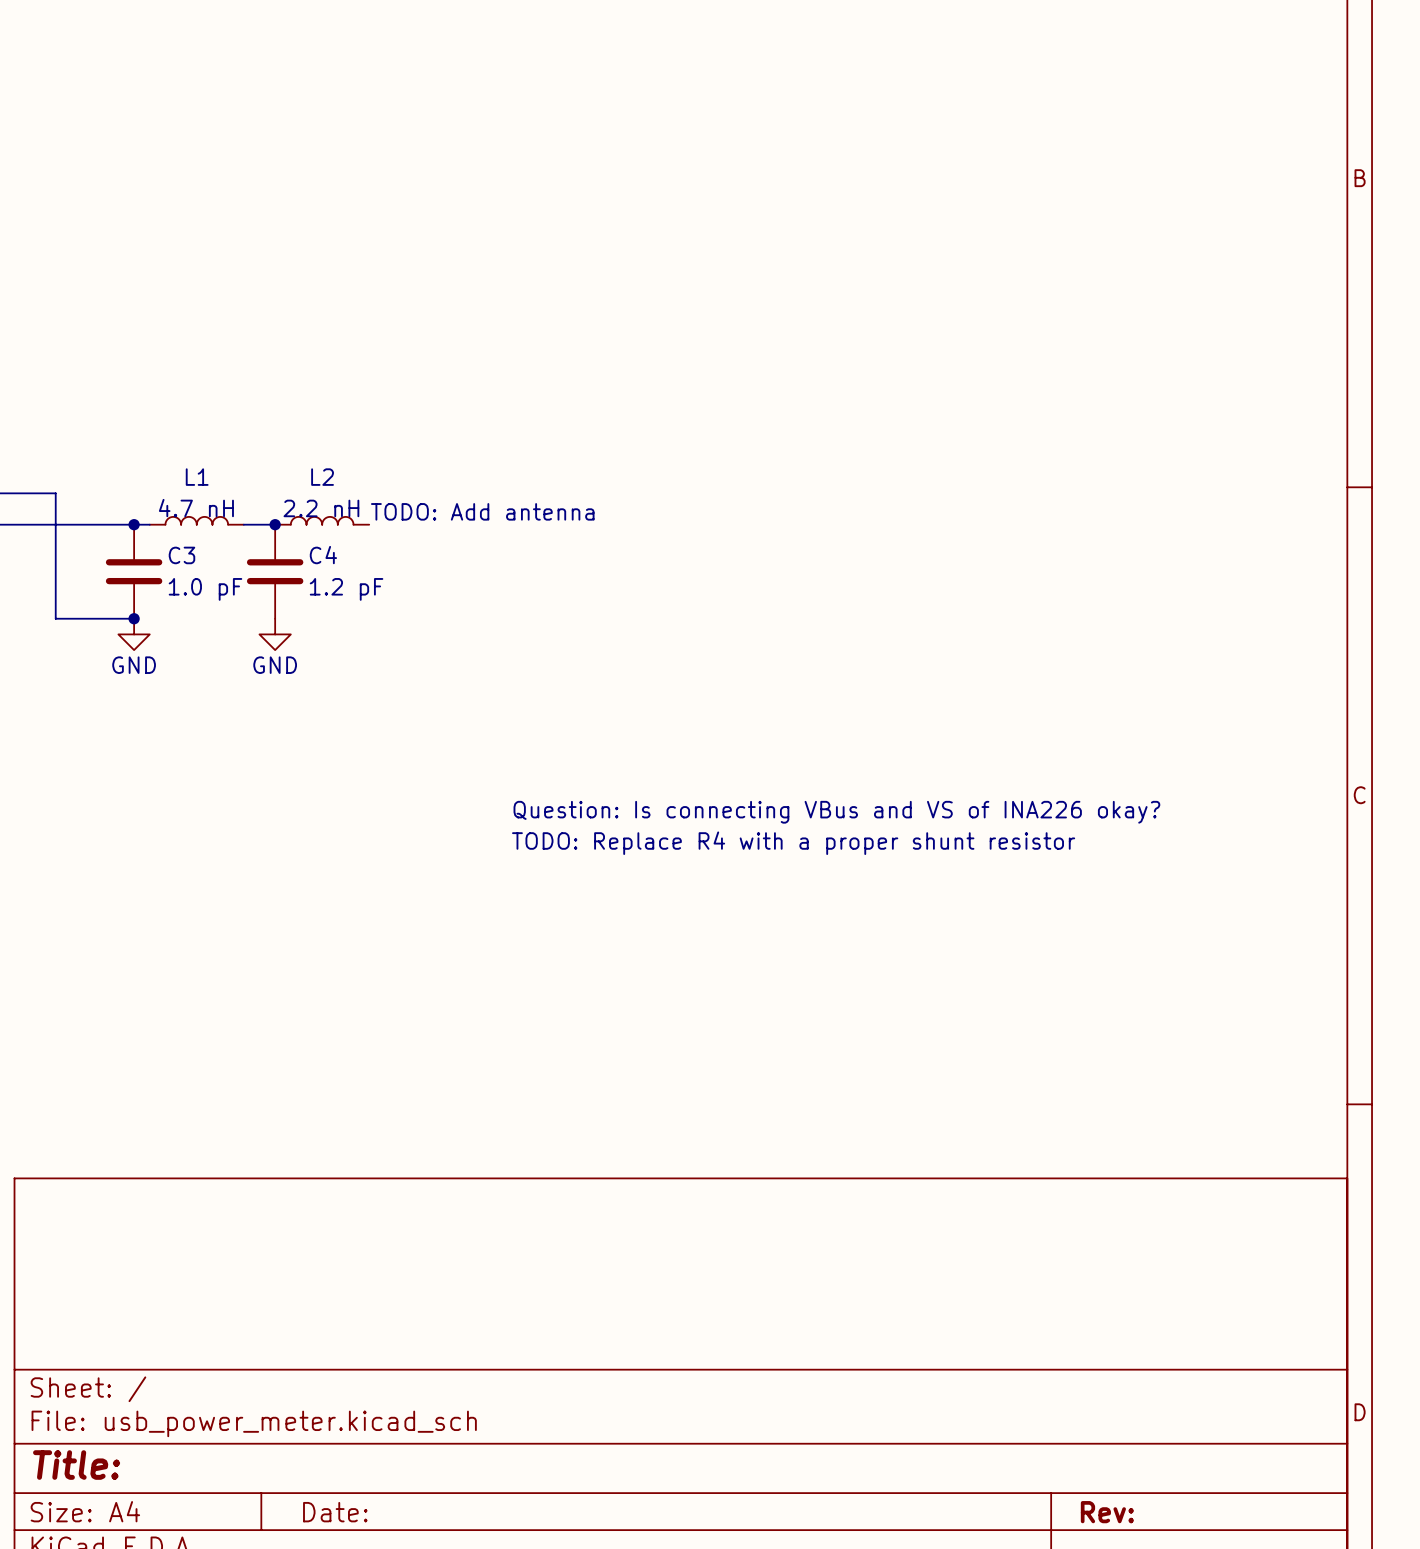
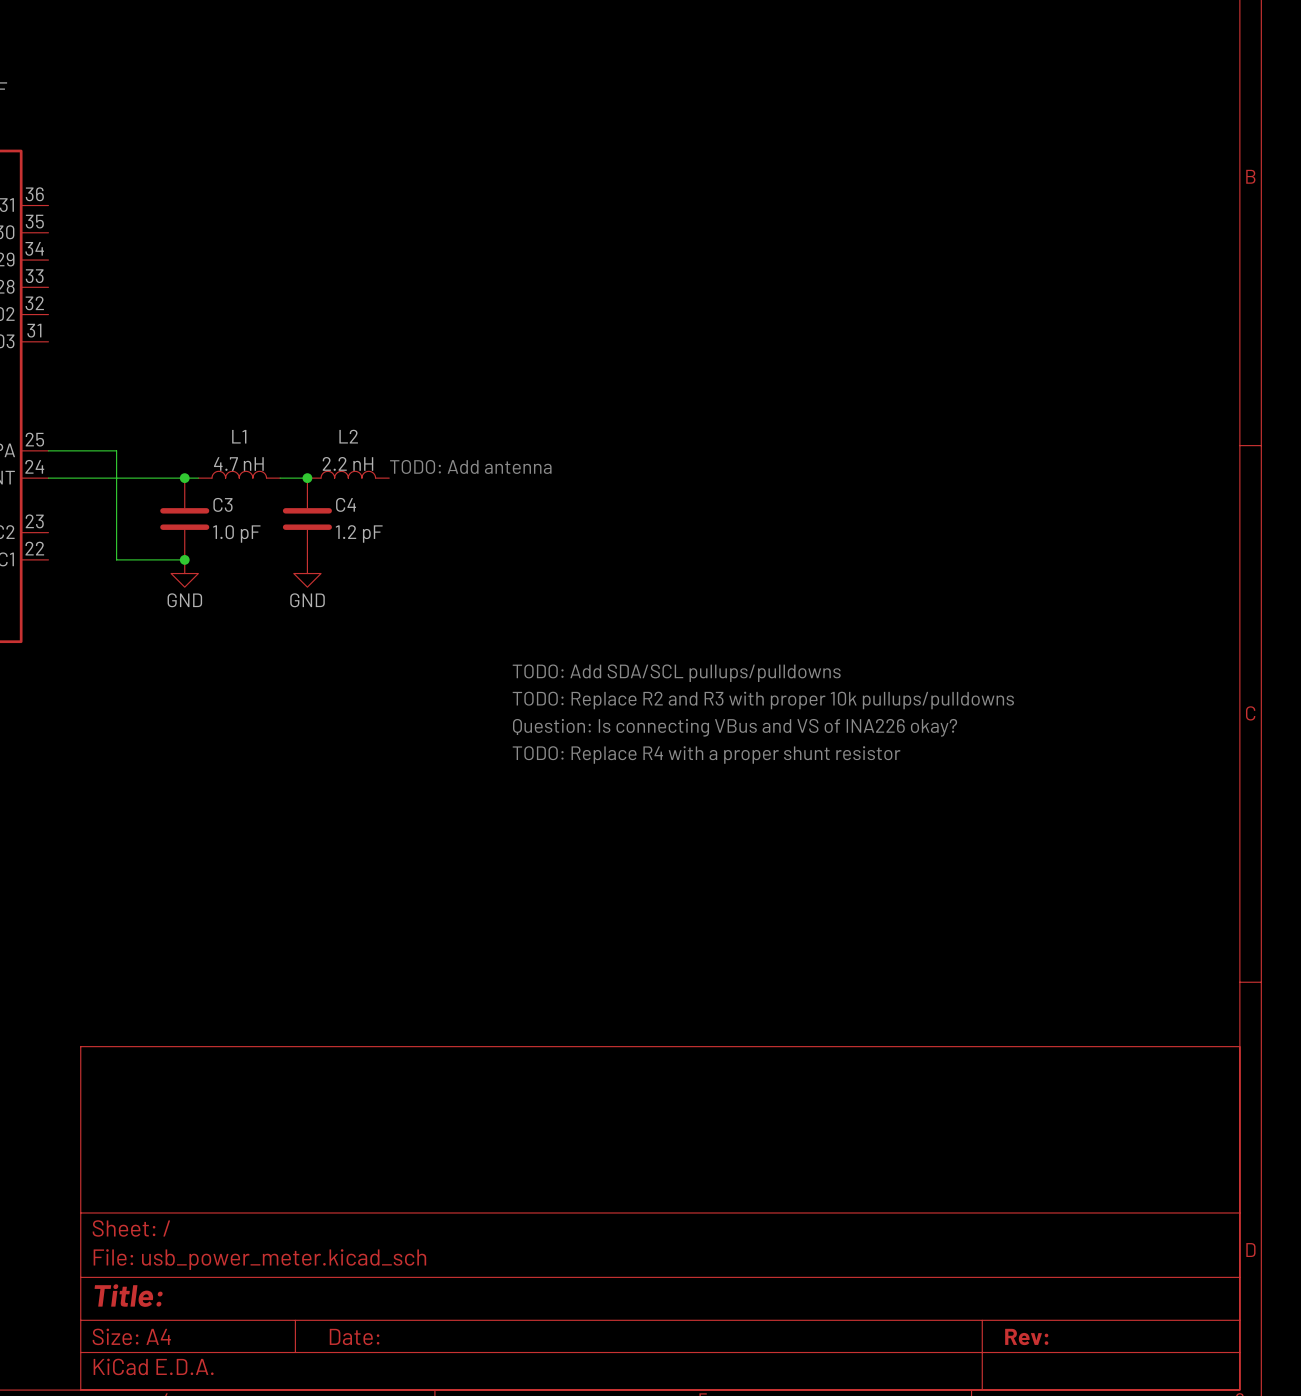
text: none -> TODO: Add SDA/SCL pullups/pulldowns (676, 673)
text: none -> TODO: Replace R2 and R3 with proper 10k pullups/pulldowns (763, 700)

